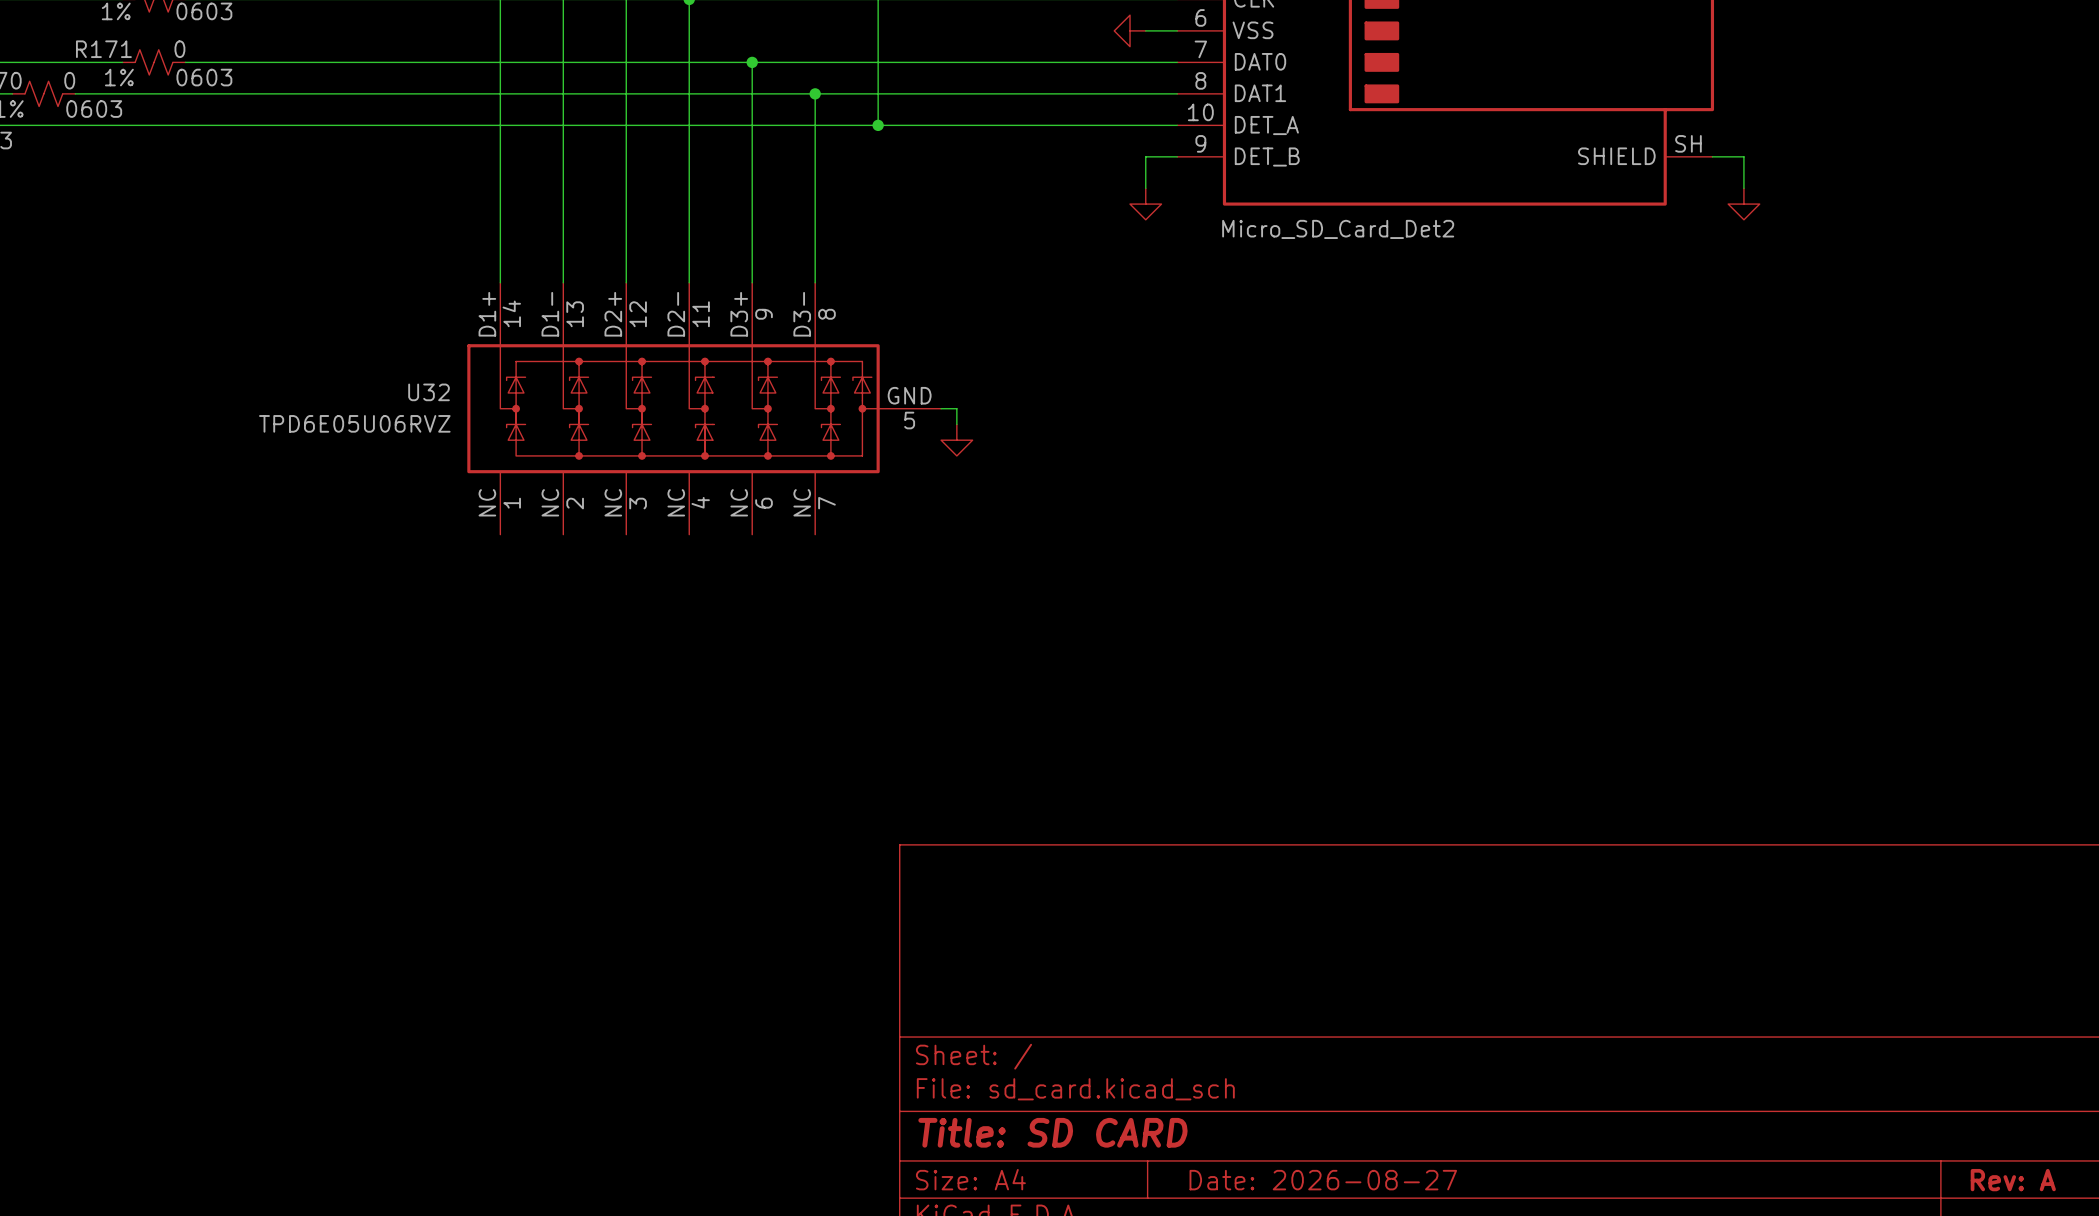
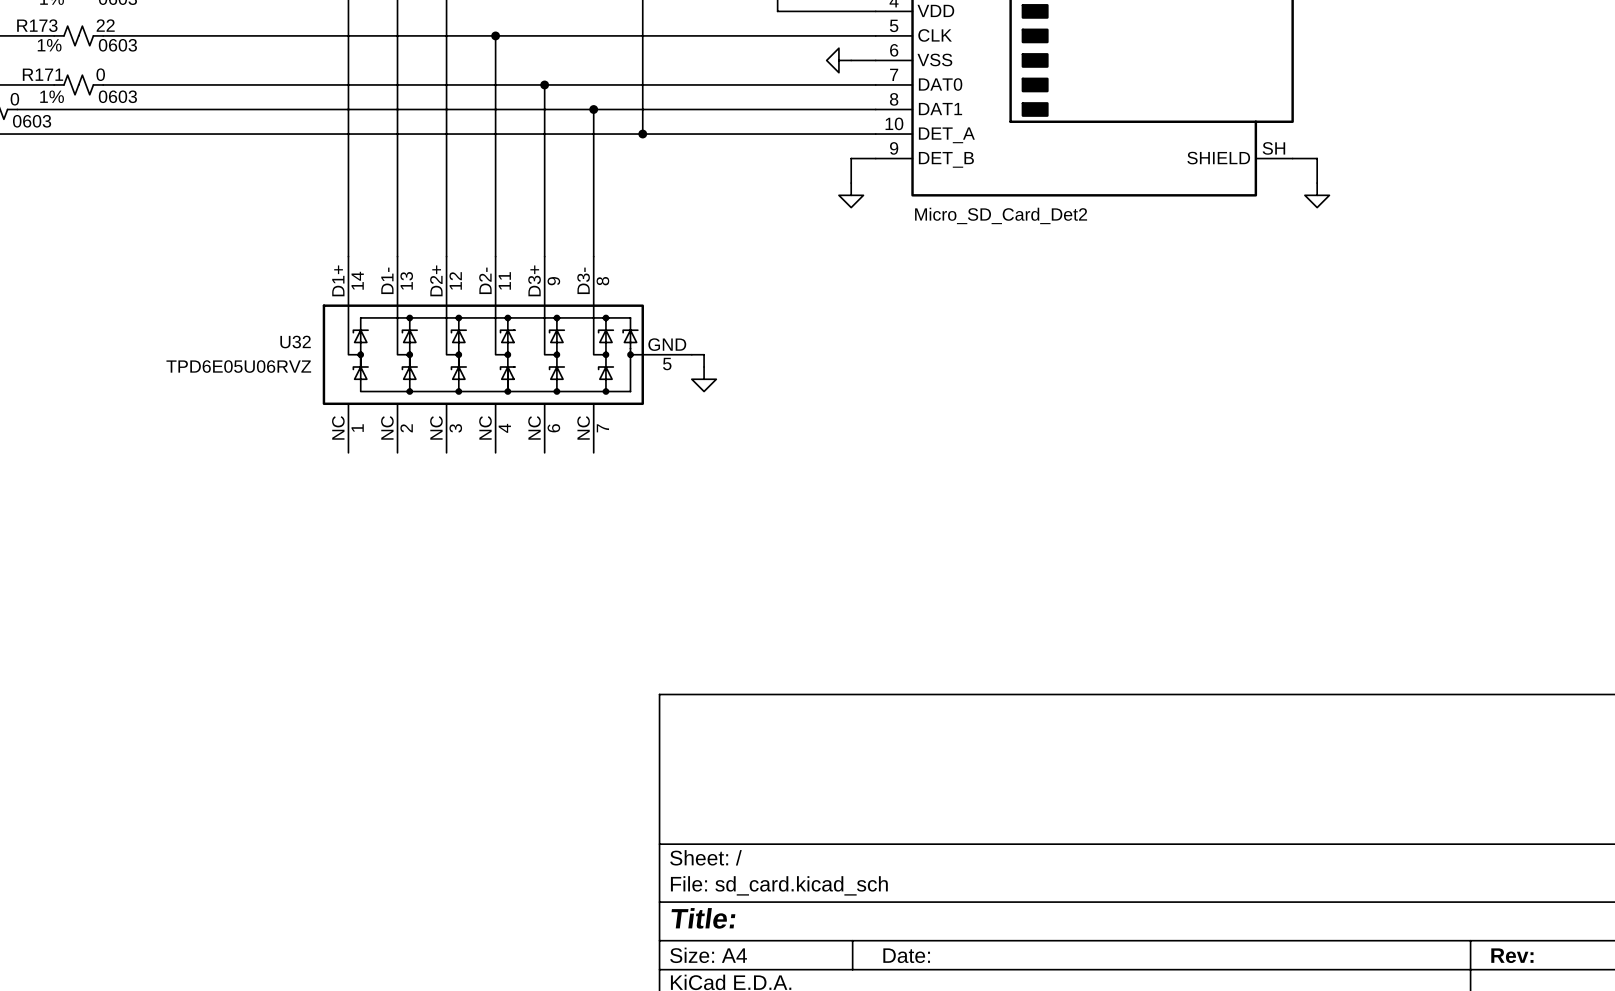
title block: Title: SD CARD (1052, 1132) -> Title: (703, 918)
title block: Date: 2026-08-27 (1323, 1180) -> Date: (906, 955)
title block: Rev: A (2013, 1180) -> Rev: (1512, 955)

